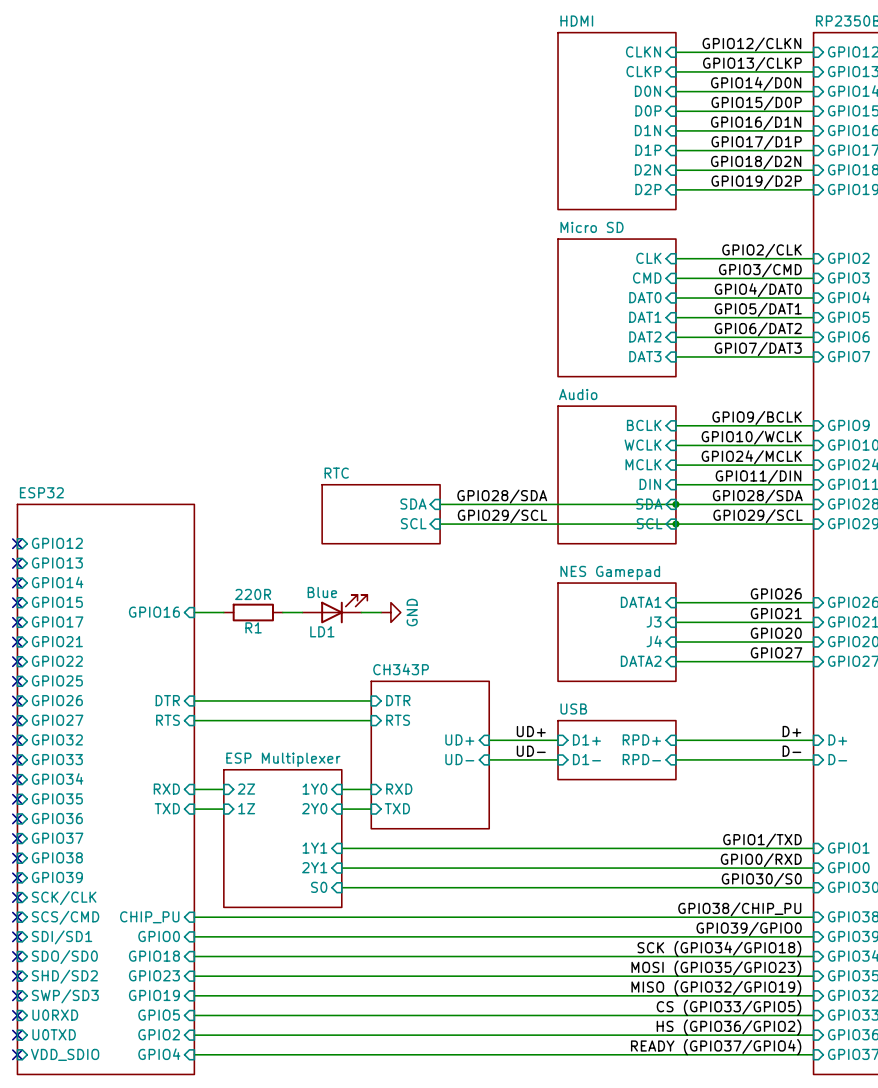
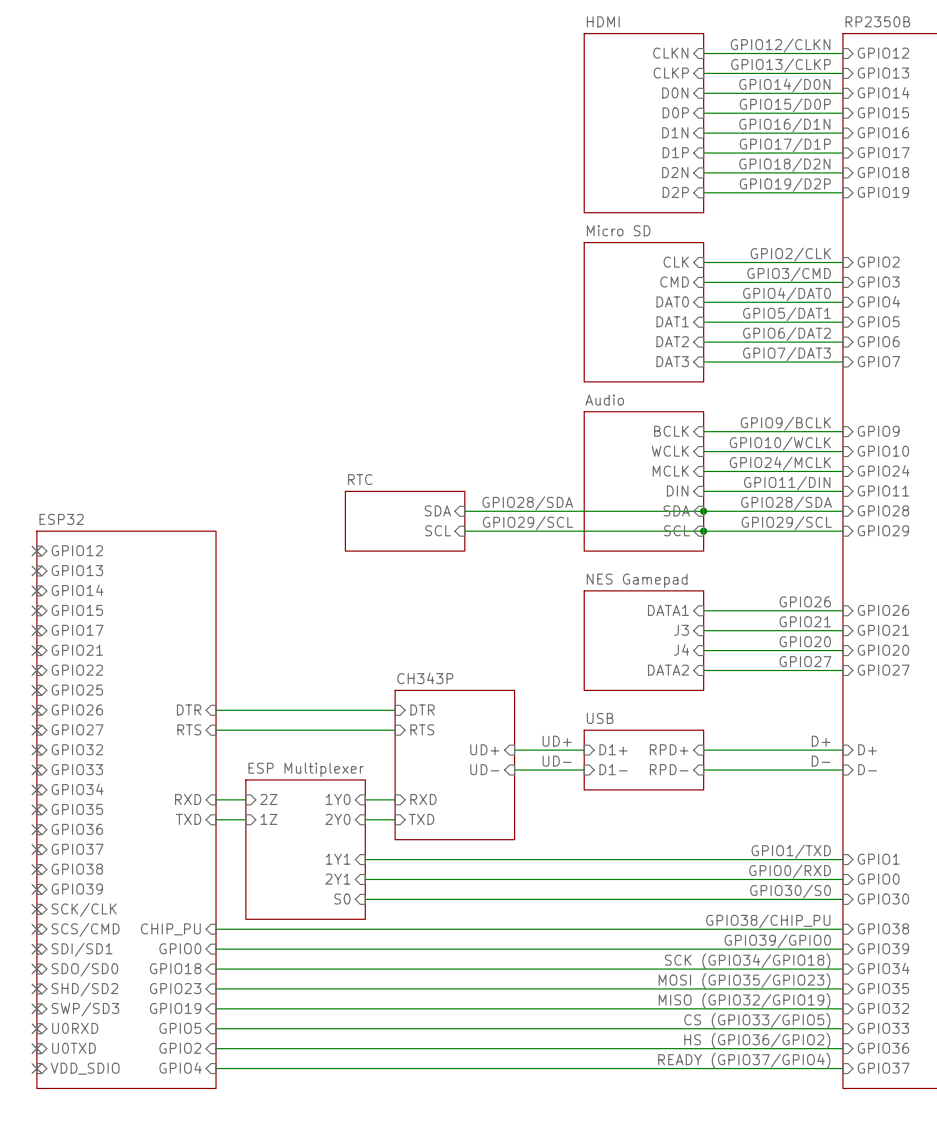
sheet ESP32 shape: [16, 503, 195, 1076] -> [36, 530, 217, 1090]
LD1: Blue (334, 609) -> none
sheet pin: GPIO16 (154, 612) -> none
wire: (194, 612) (223, 612) -> none
R1: 220R (253, 612) -> none
wire: (282, 612) (302, 612) -> none
wire: (361, 612) (381, 612) -> none
power symbol: GND (390, 612) -> none

